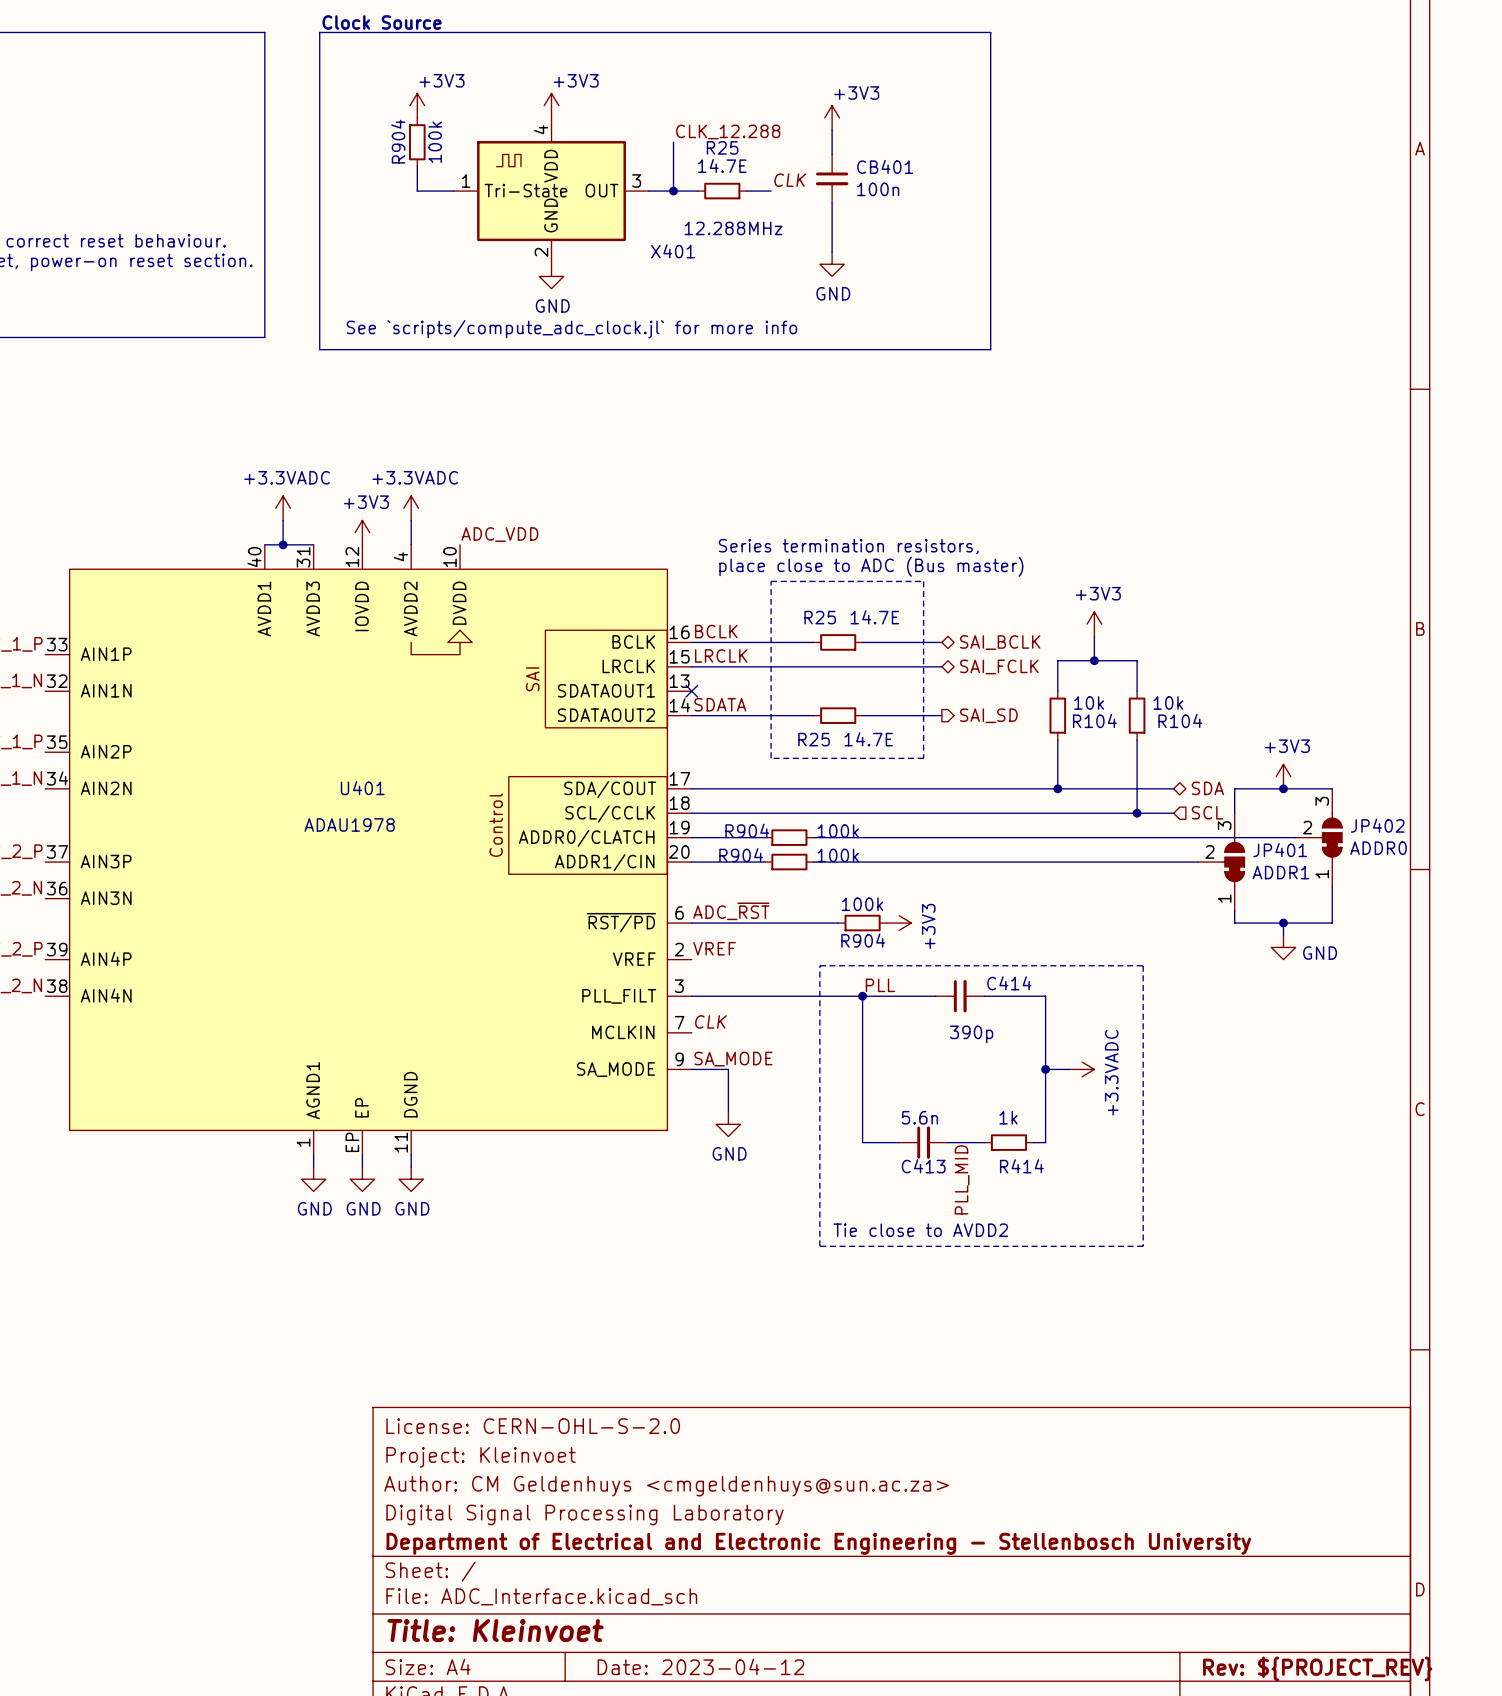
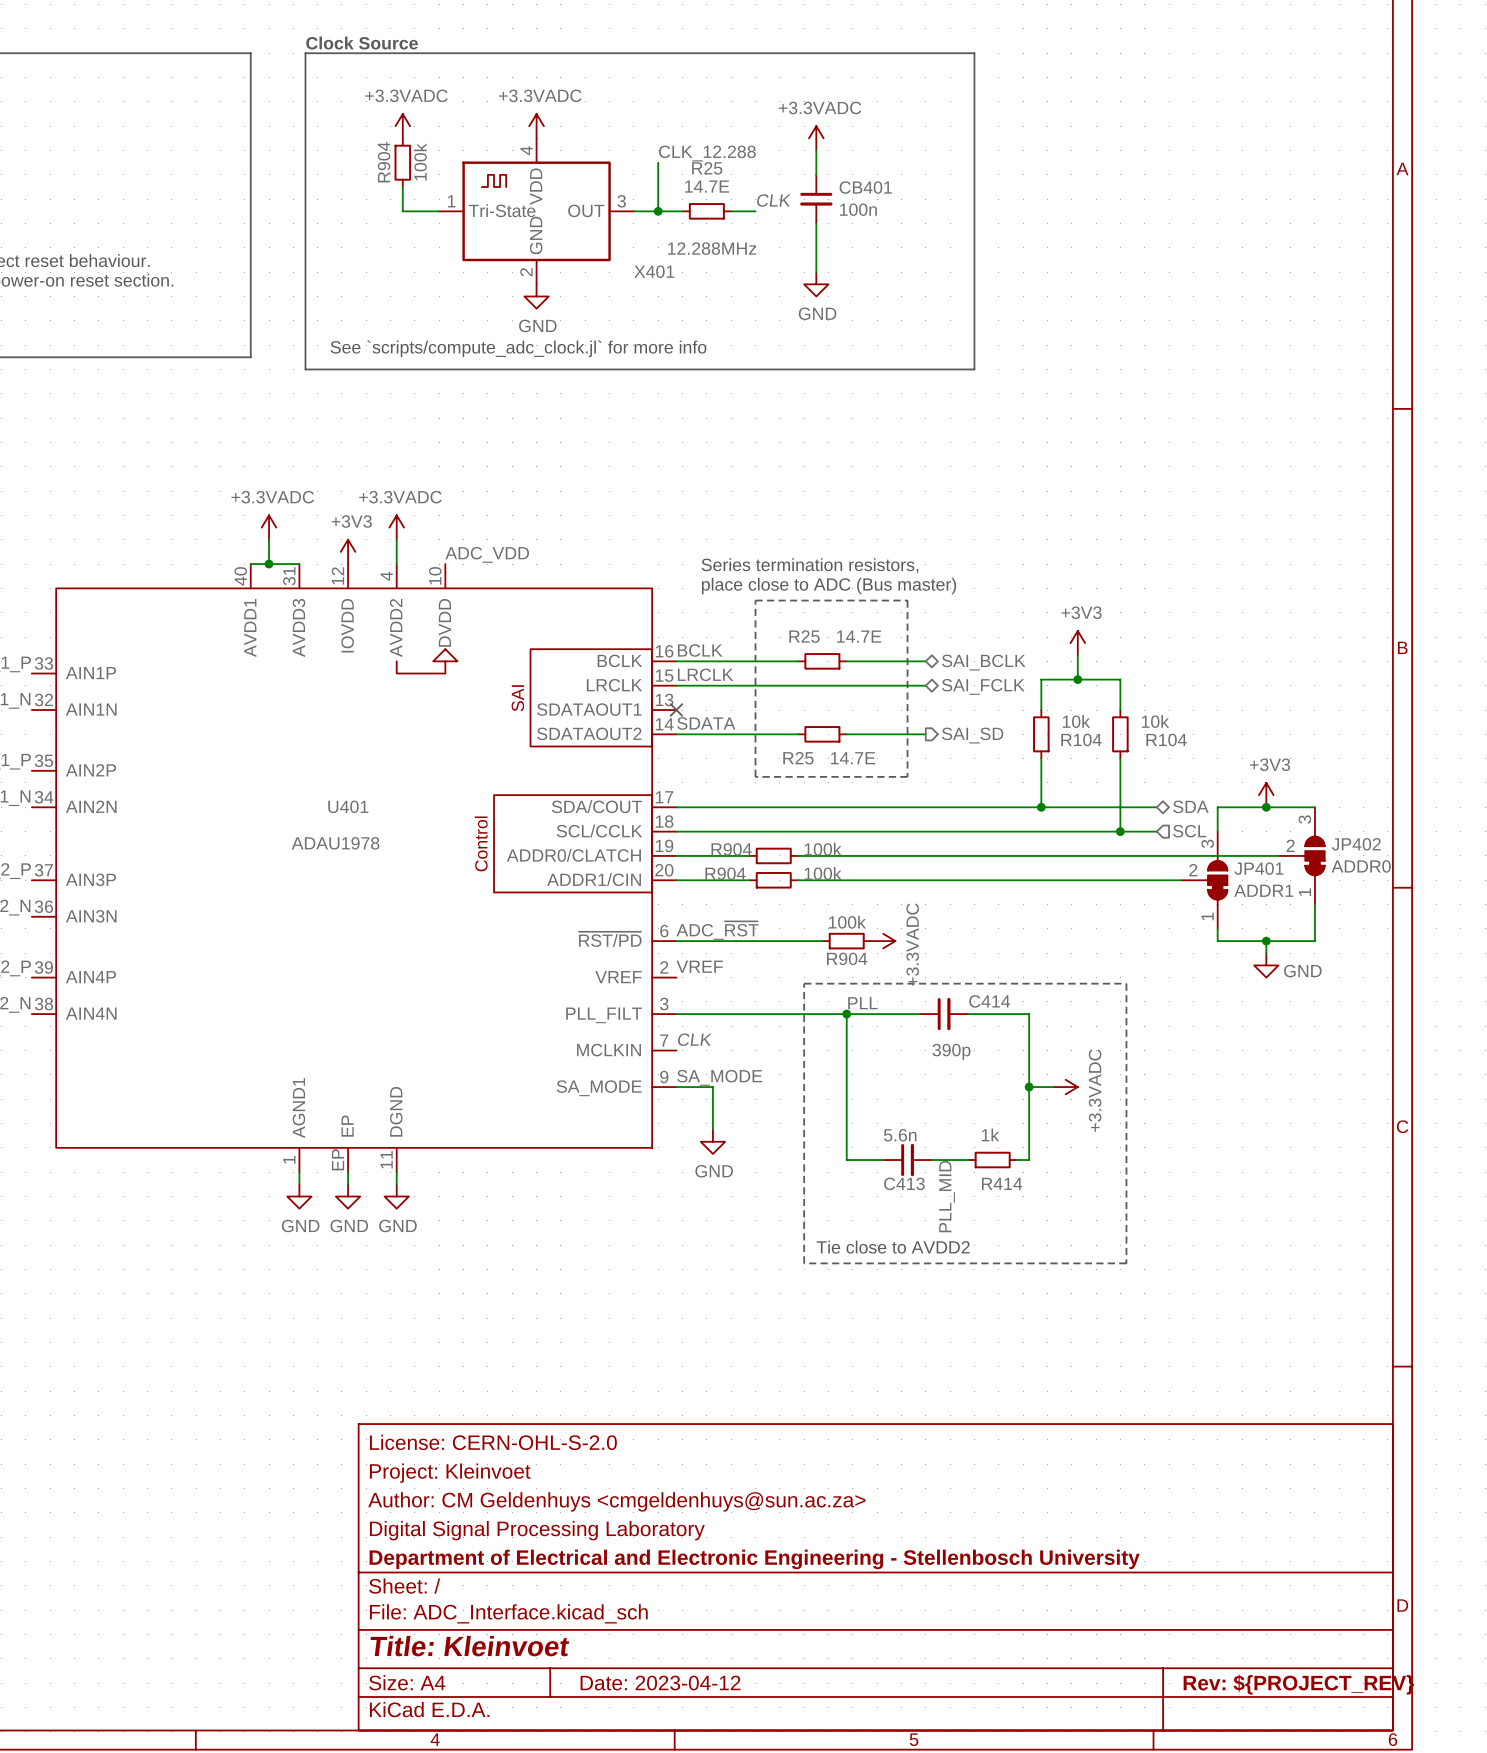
power symbol: +3V3 (417, 105) -> +3.3VADC (402, 126)
power symbol: +3V3 (551, 105) -> +3.3VADC (536, 126)
power symbol: +3V3 (832, 117) -> +3.3VADC (816, 138)
power symbol: +3V3 (899, 923) -> +3.3VADC (883, 941)

